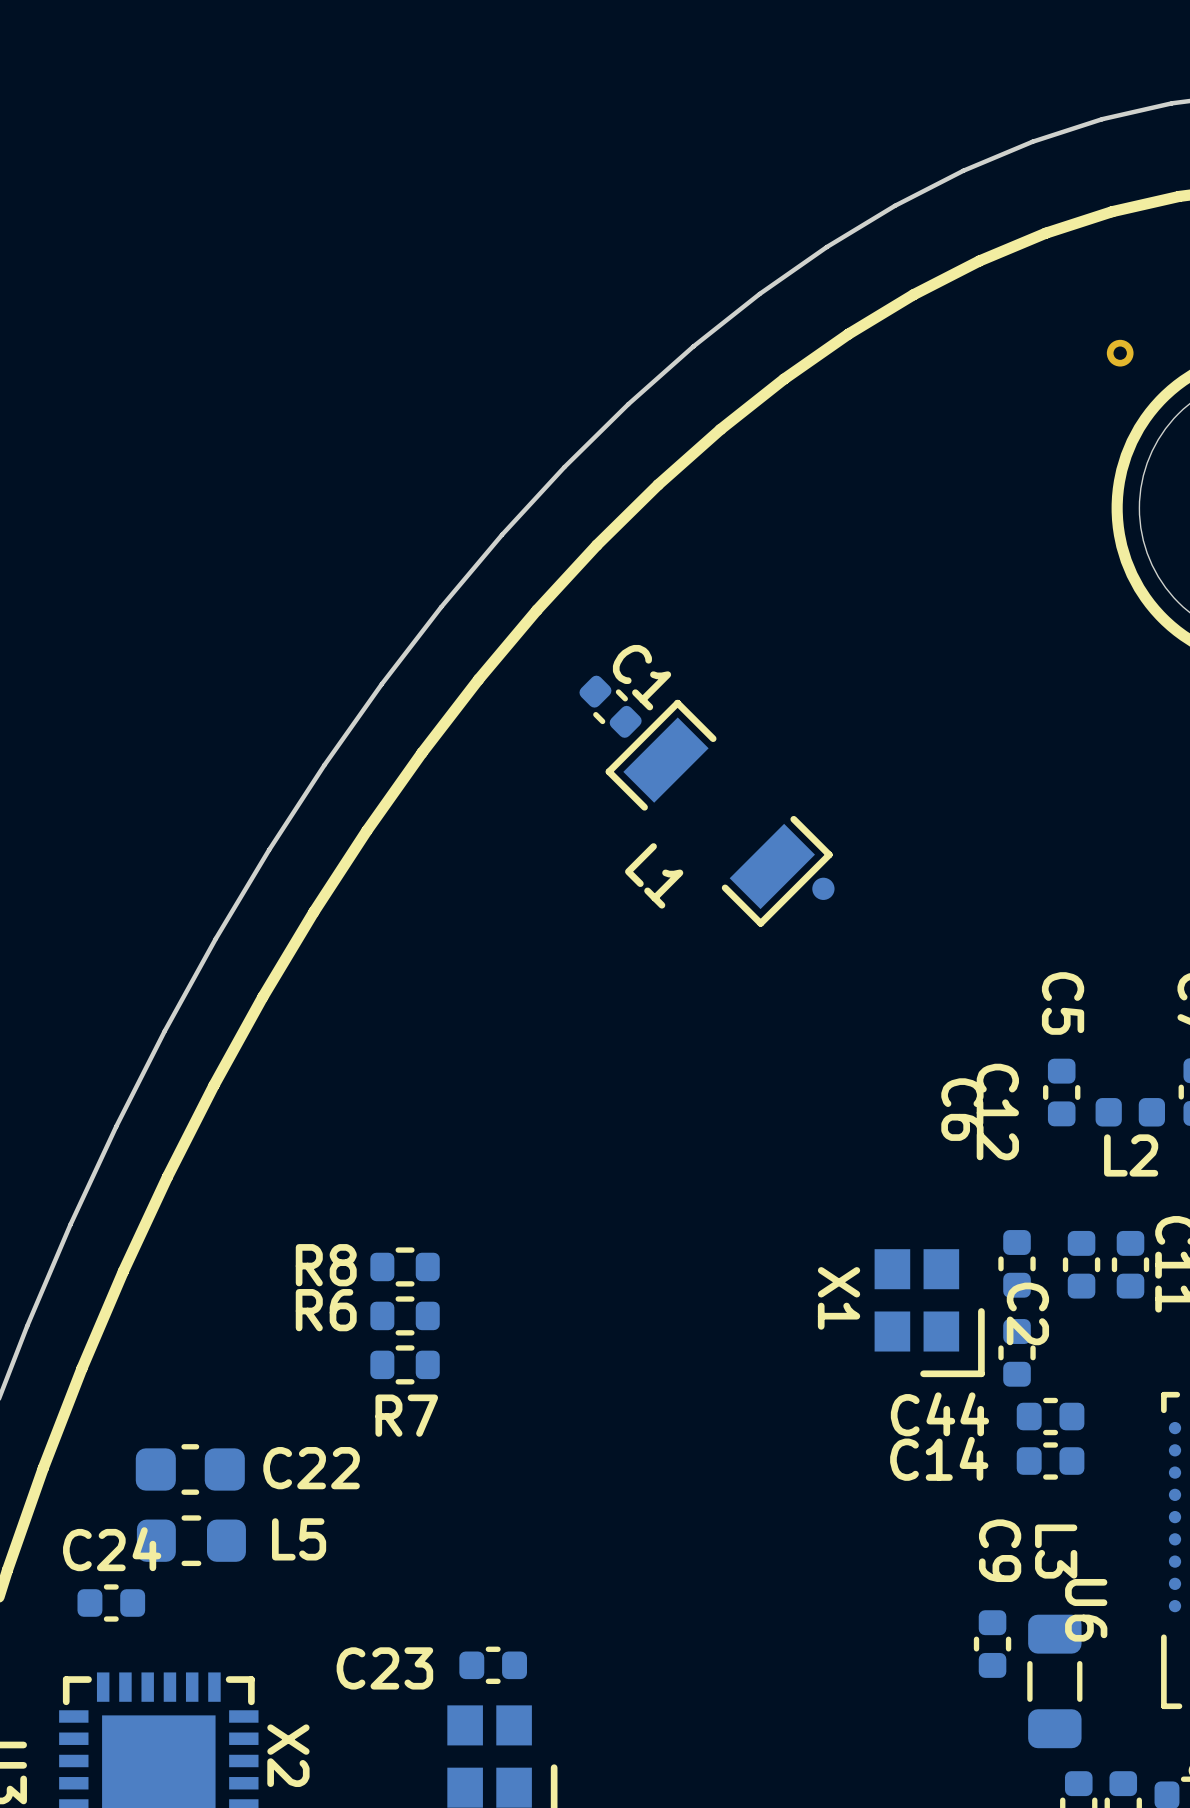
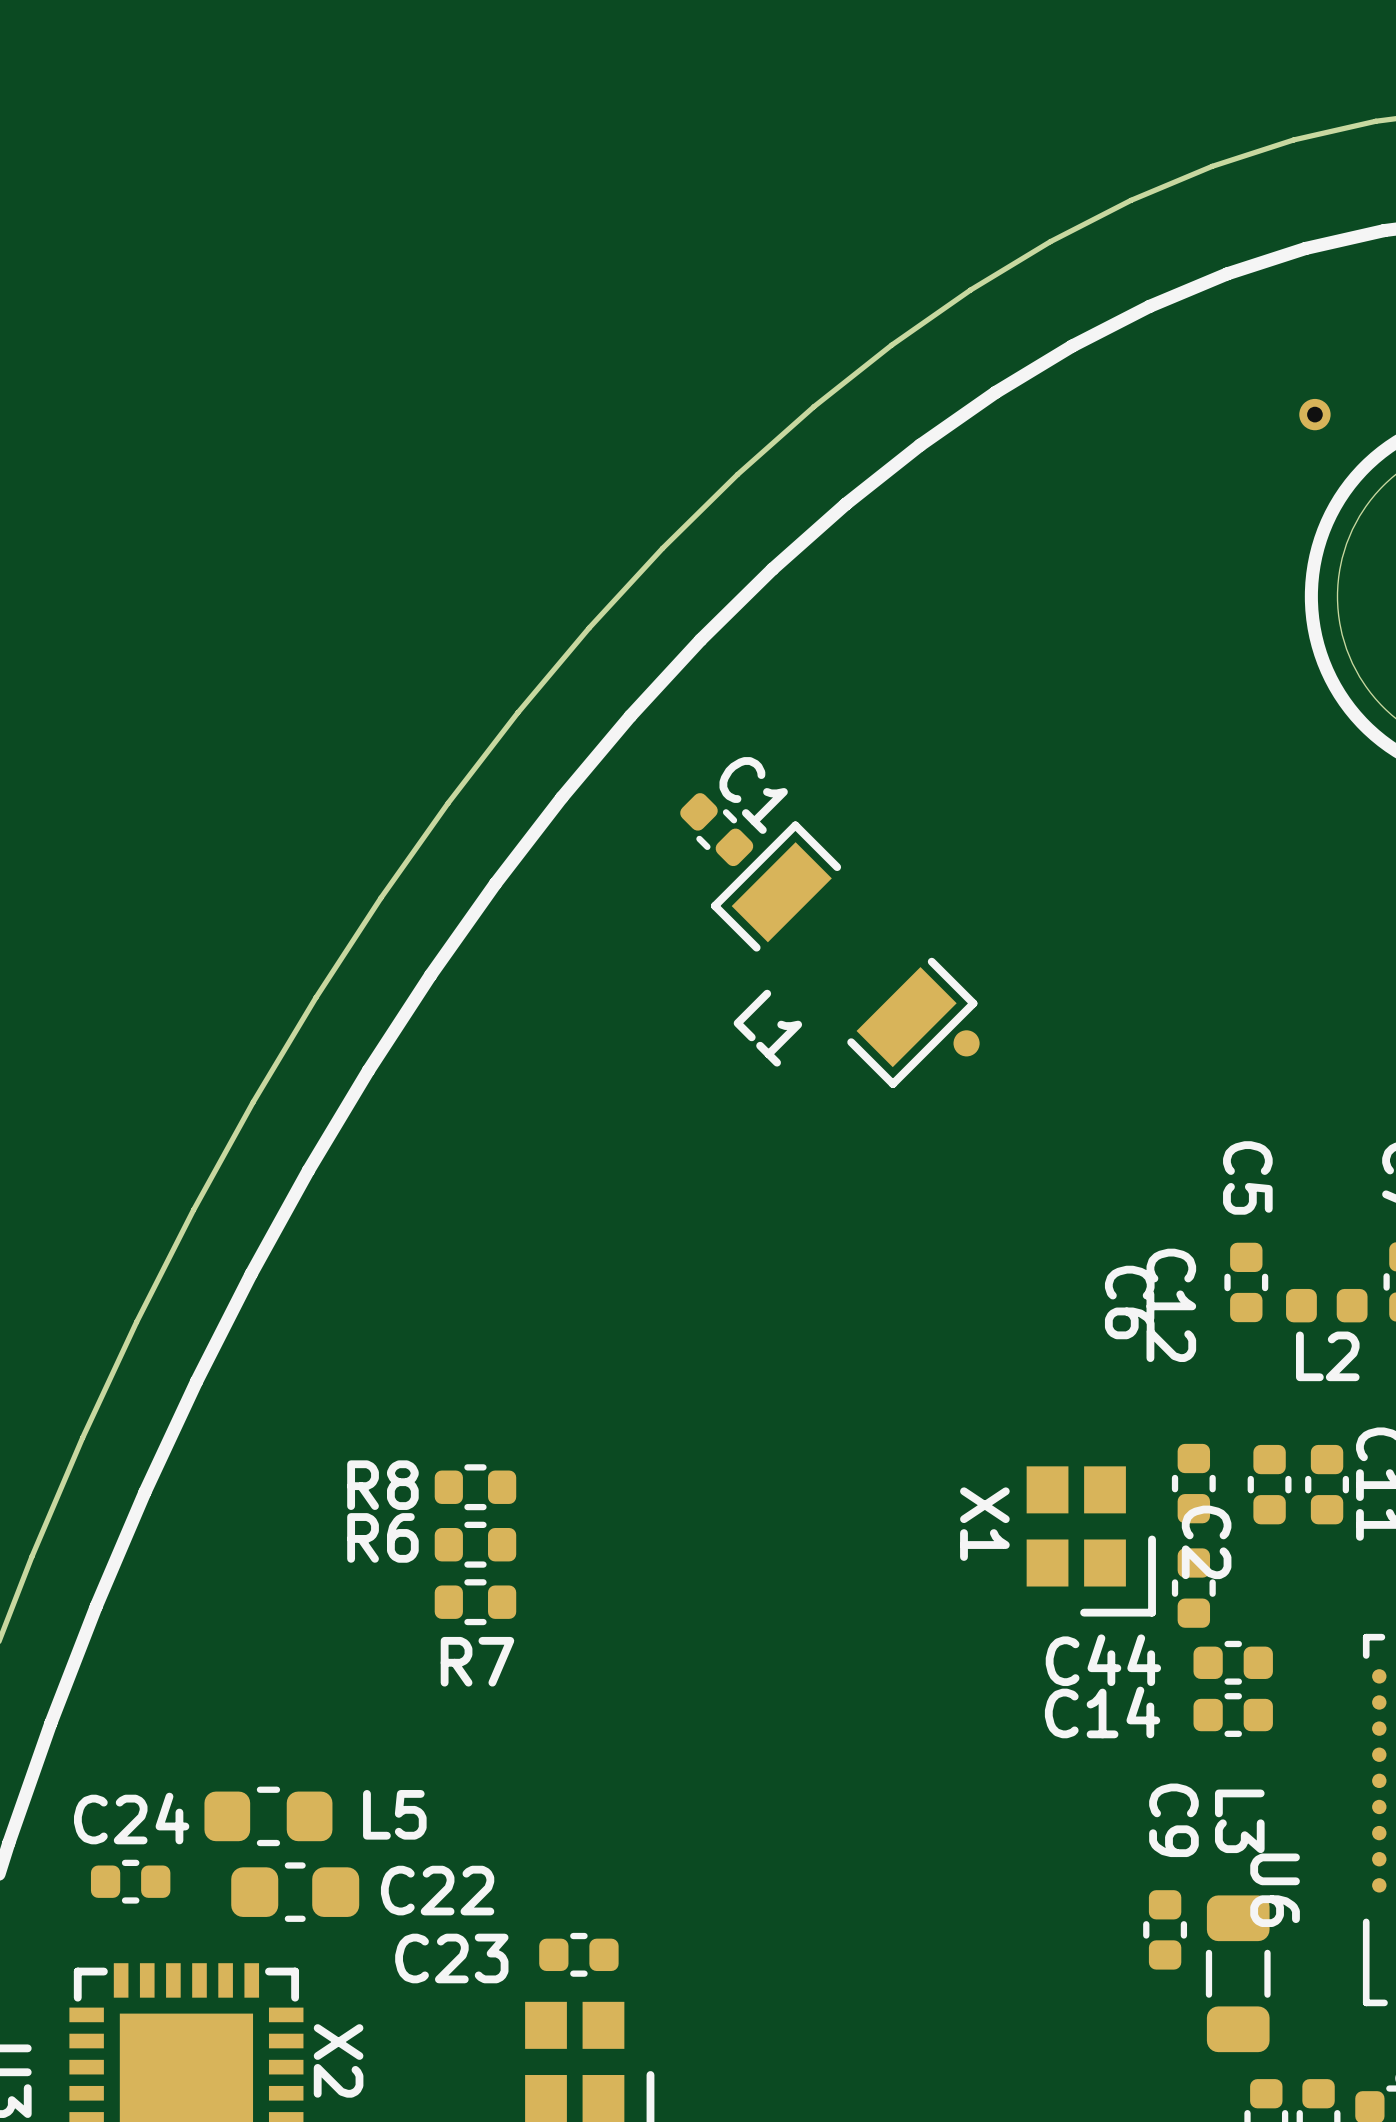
C22 position: (190, 1469) -> (295, 1892)
L5 position: (191, 1540) -> (268, 1816)

